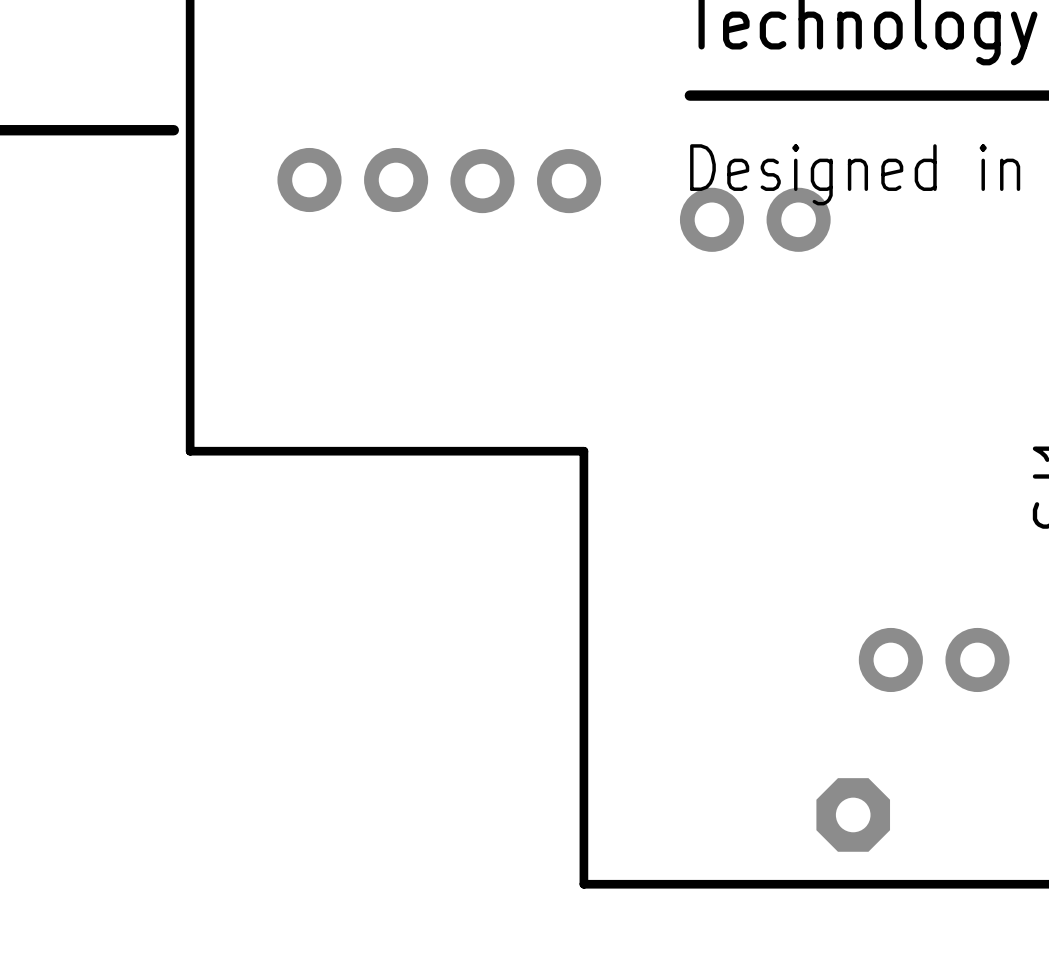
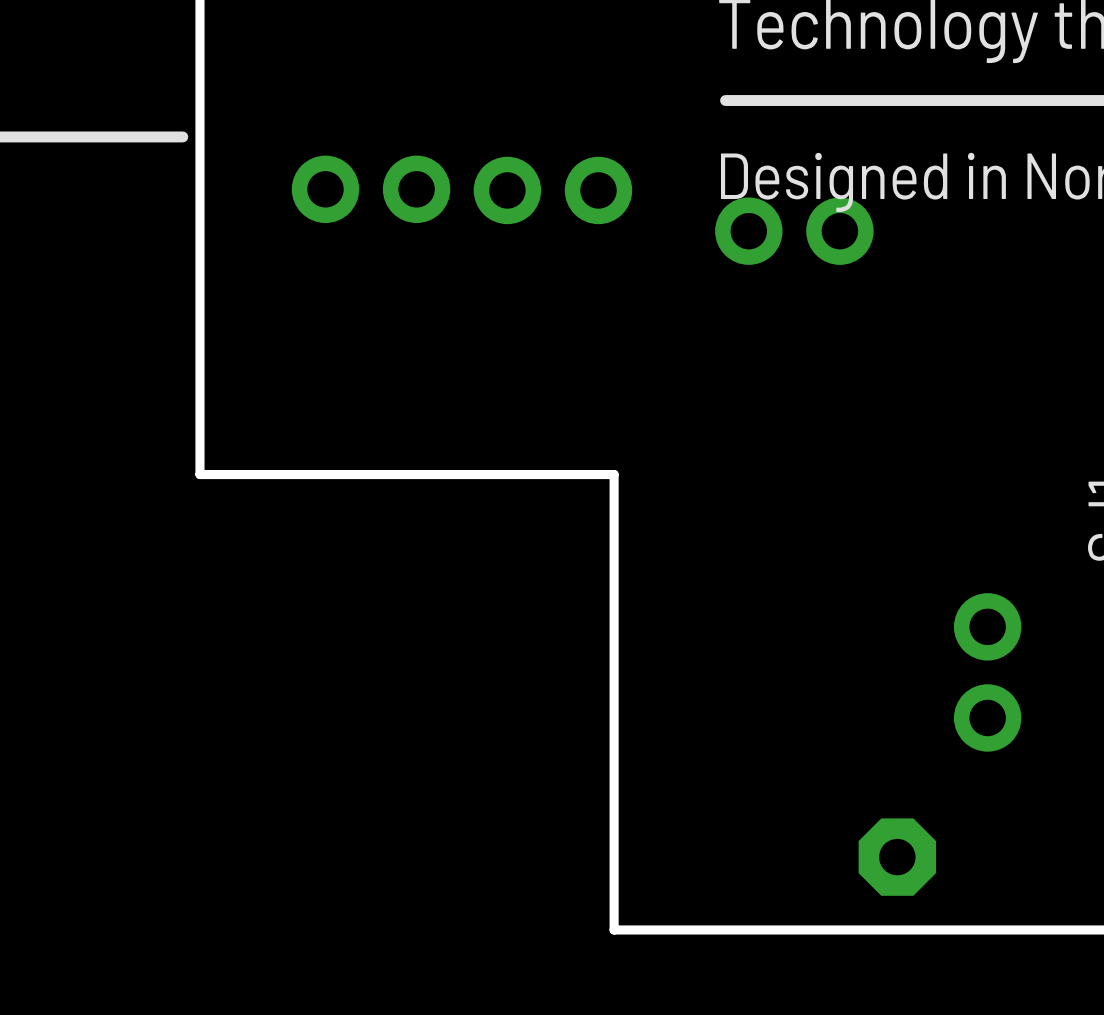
part rotation: 0° (934, 659) -> 90° clockwise (987, 672)

